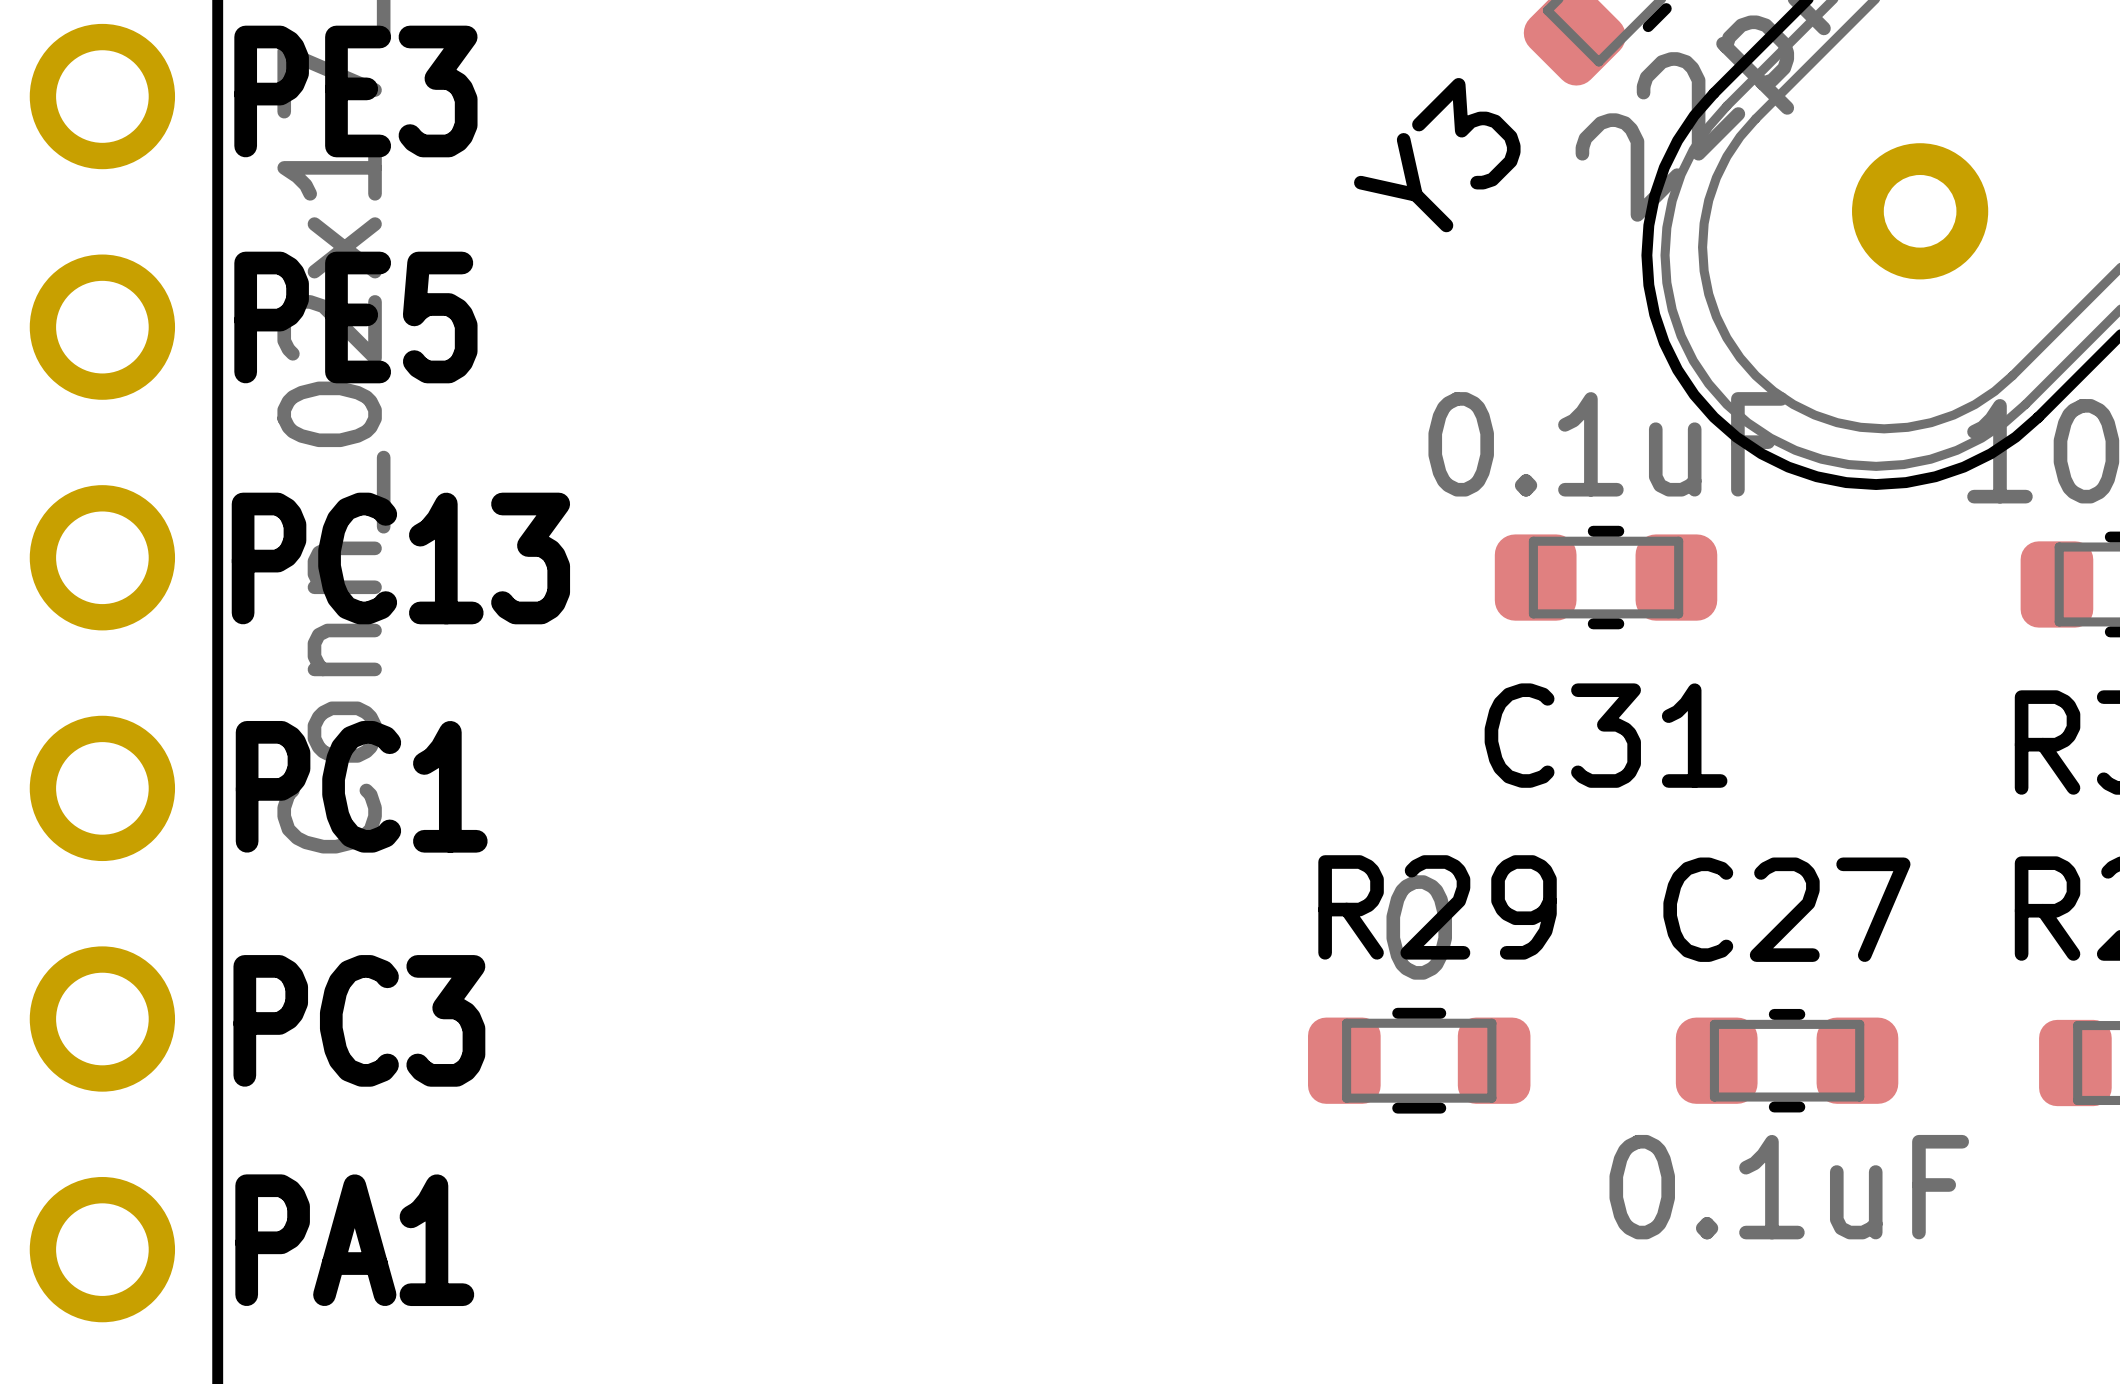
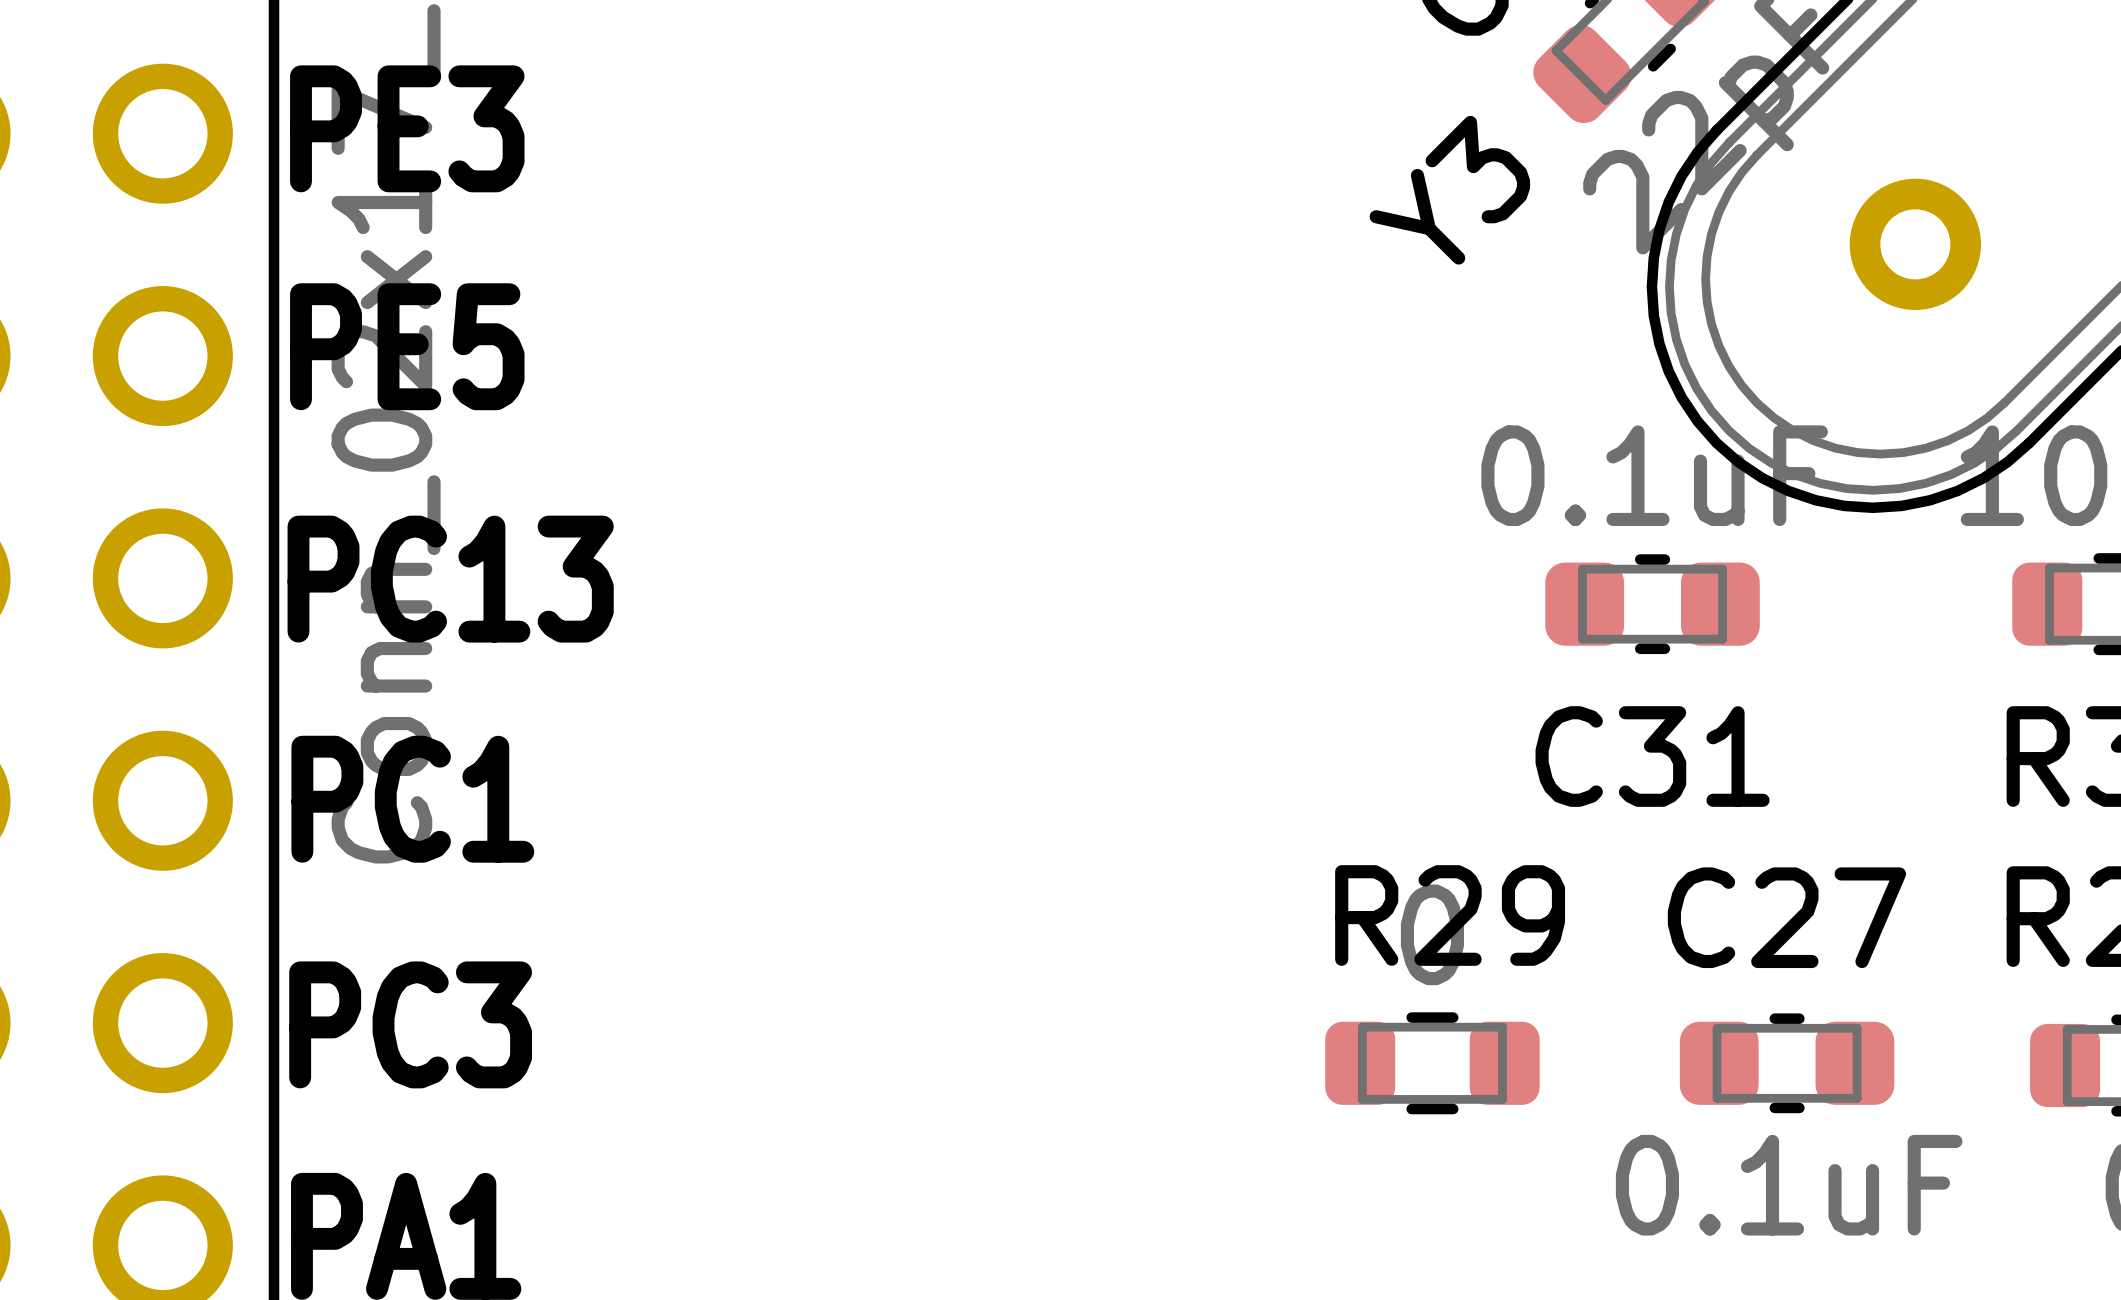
C31 position: (1606, 577) -> (1652, 604)

